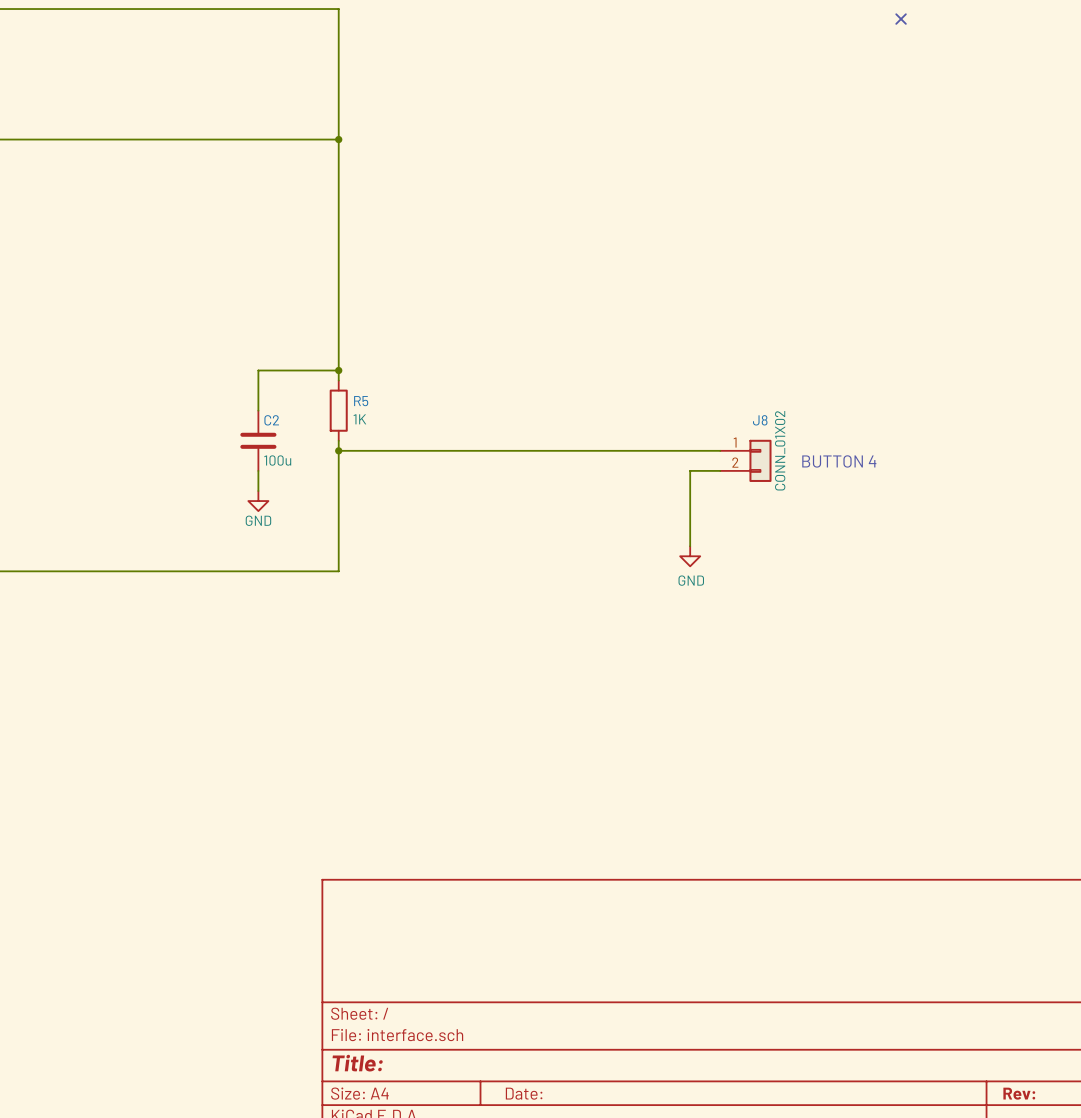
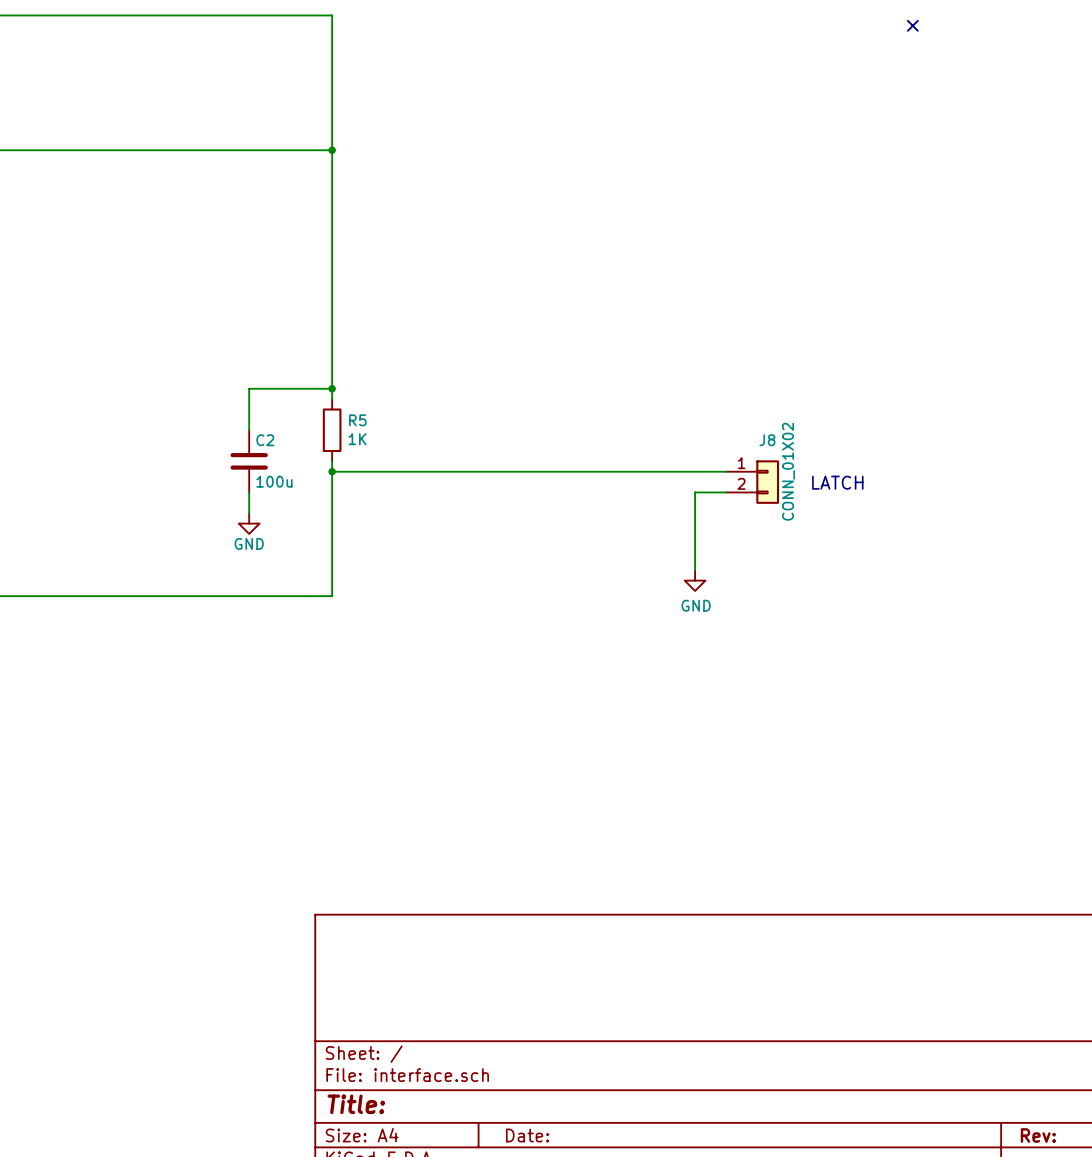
text: BUTTON 4 (839, 461) -> LATCH (837, 482)

